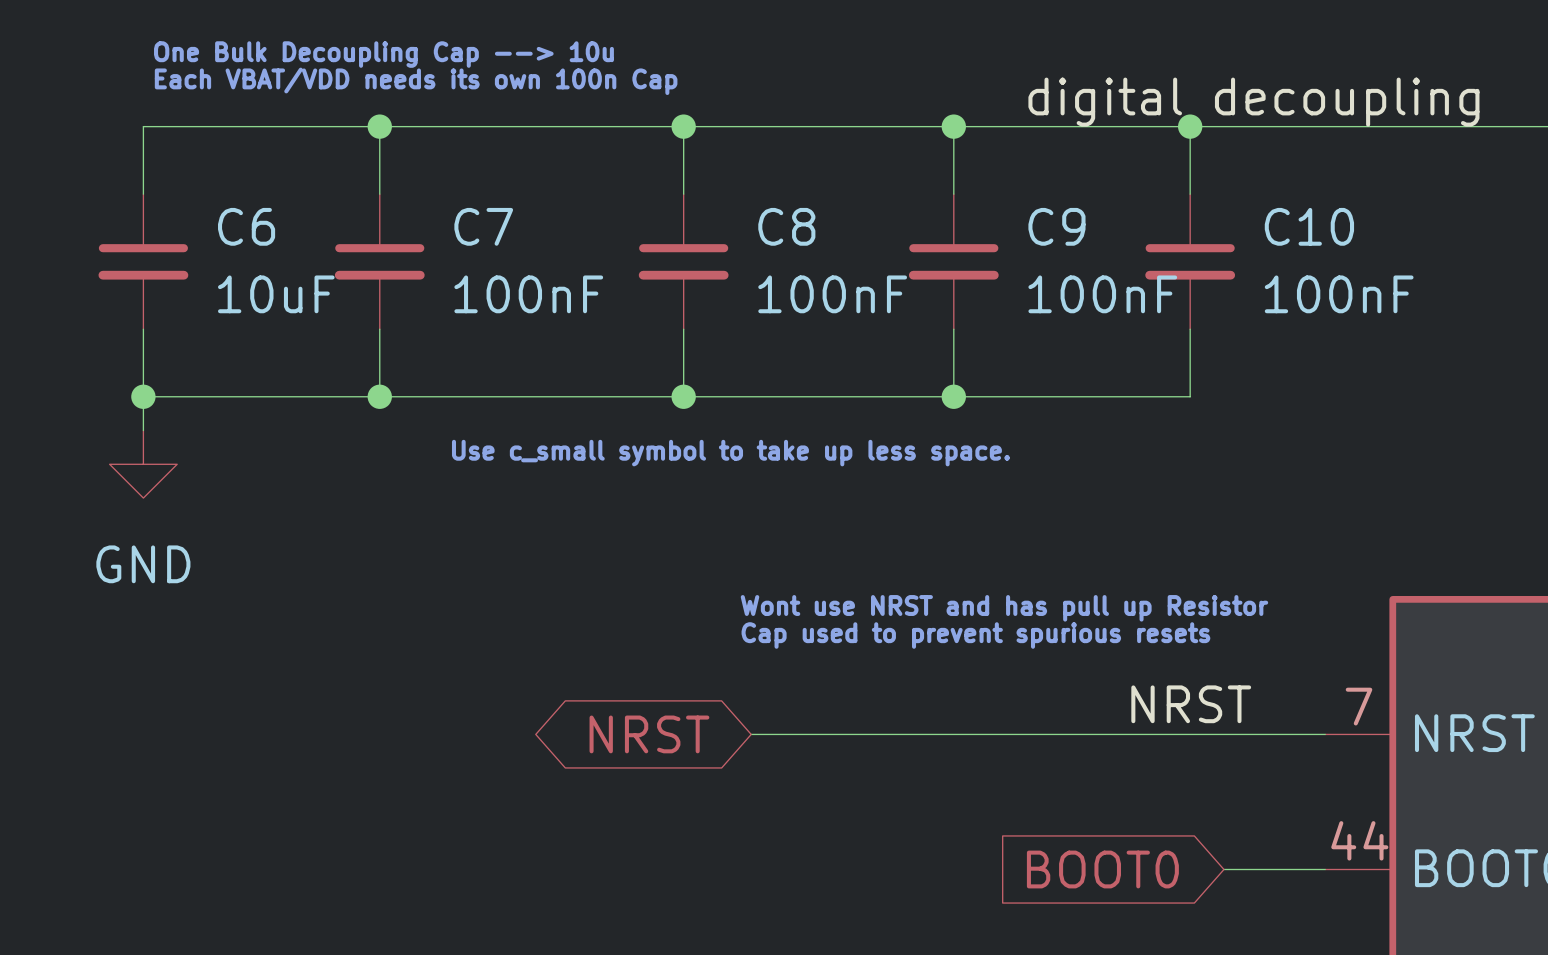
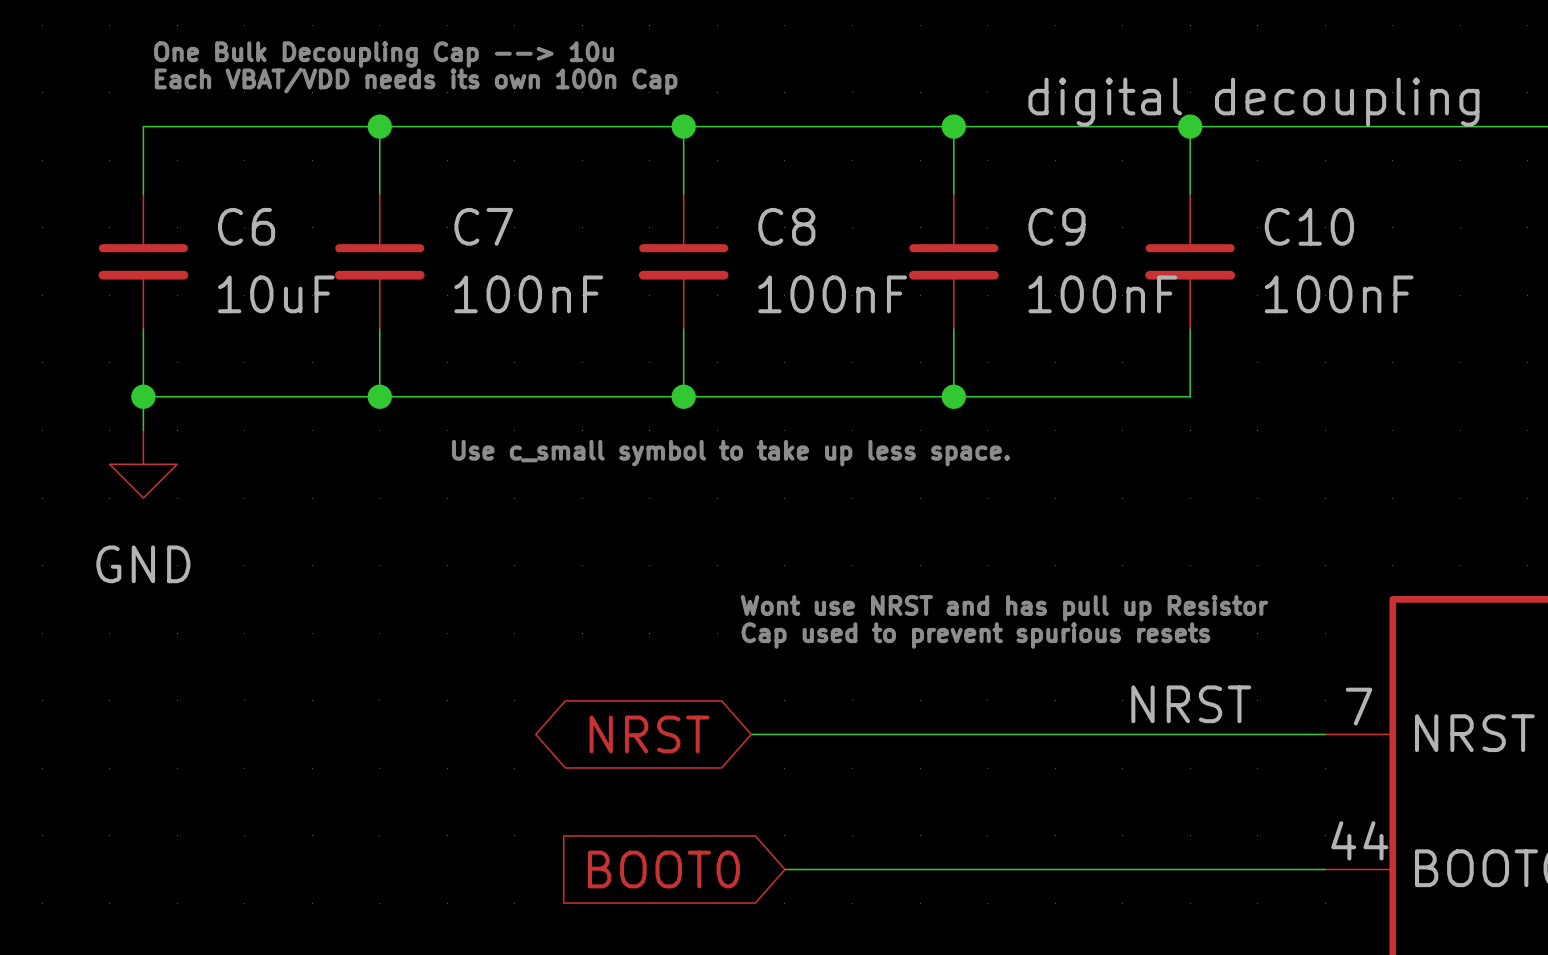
wire: none -> (784, 869) (1223, 869)
global label position: BOOT0 (1102, 869) -> BOOT0 (663, 869)

